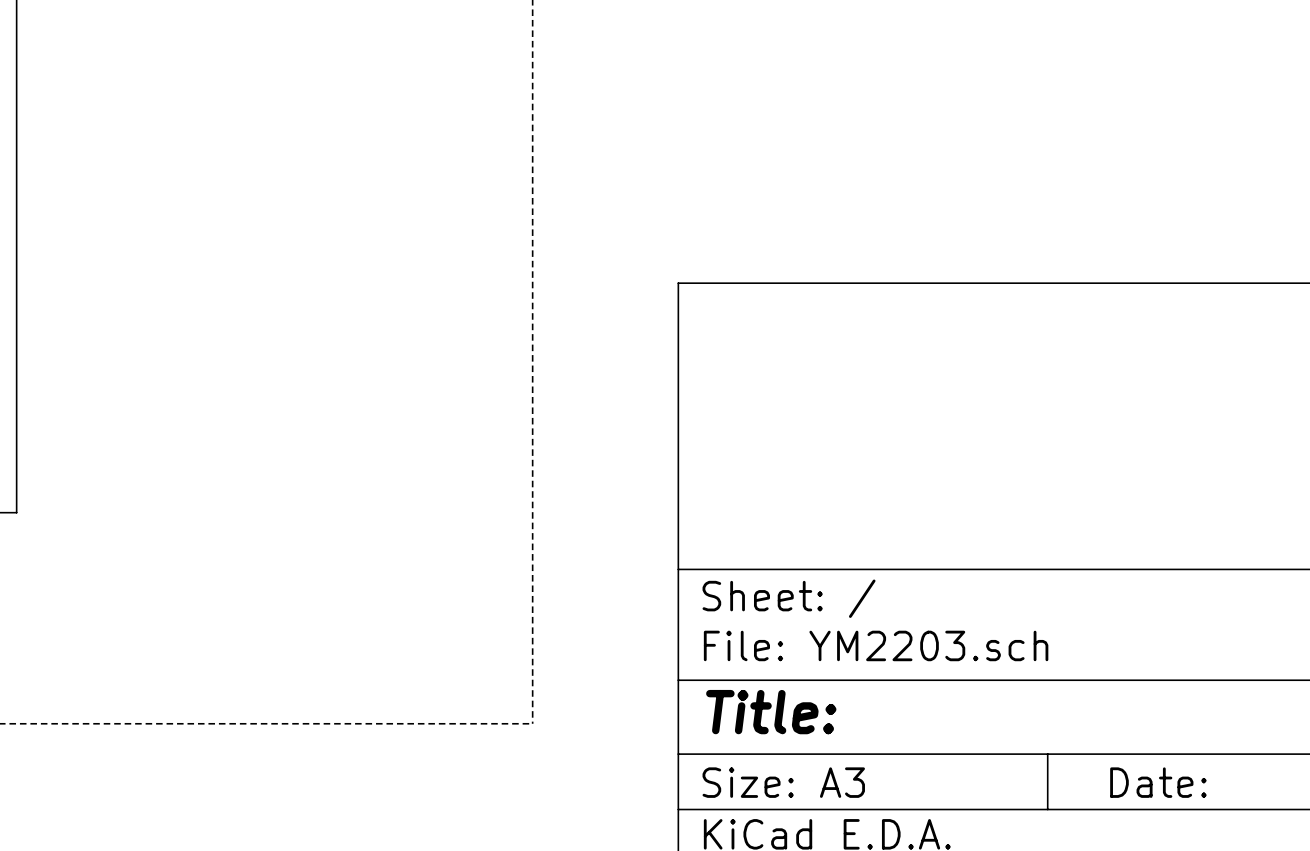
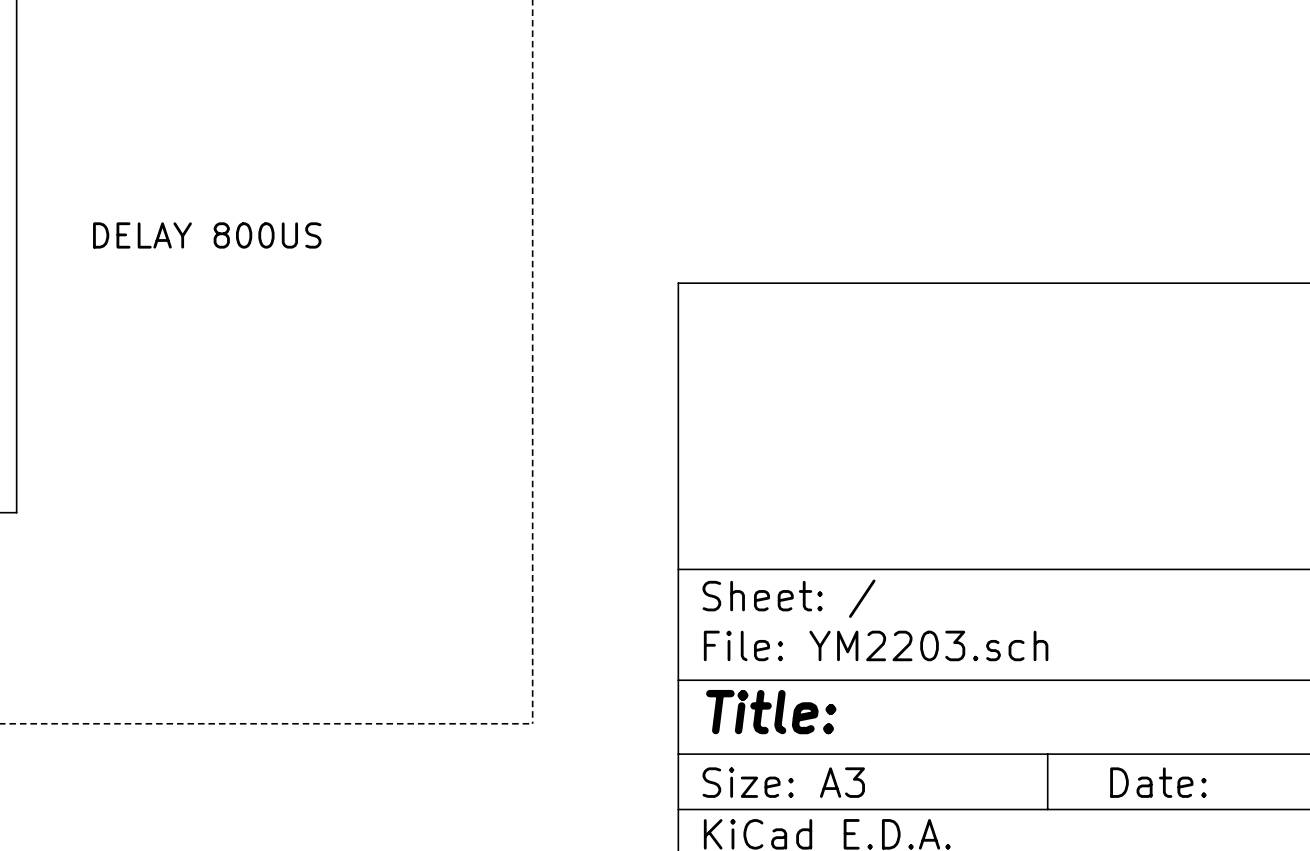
text: none -> DELAY 800US (207, 235)

